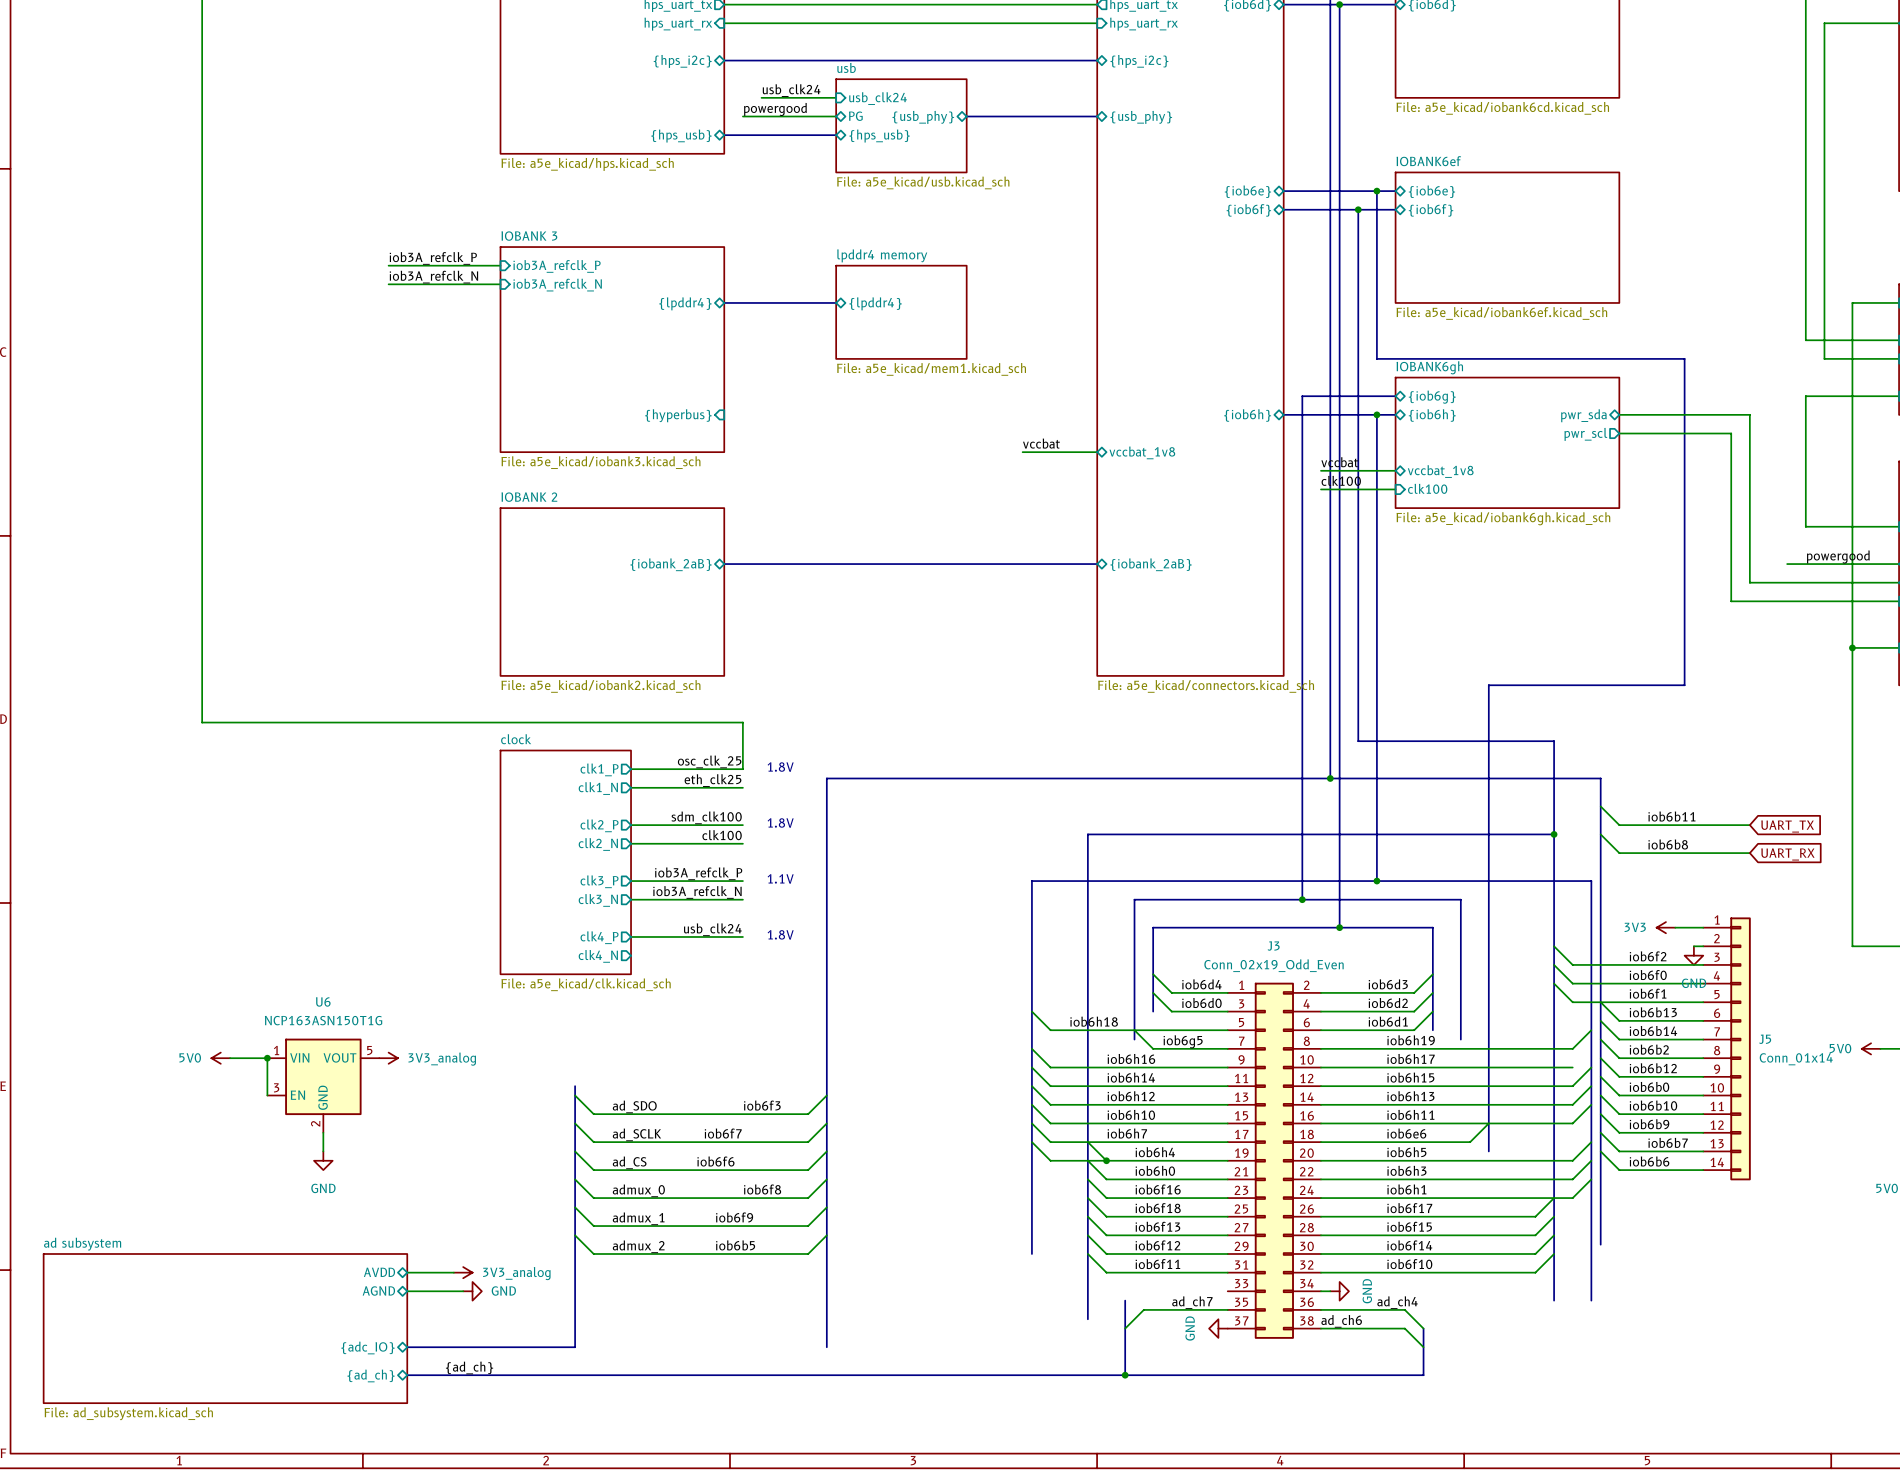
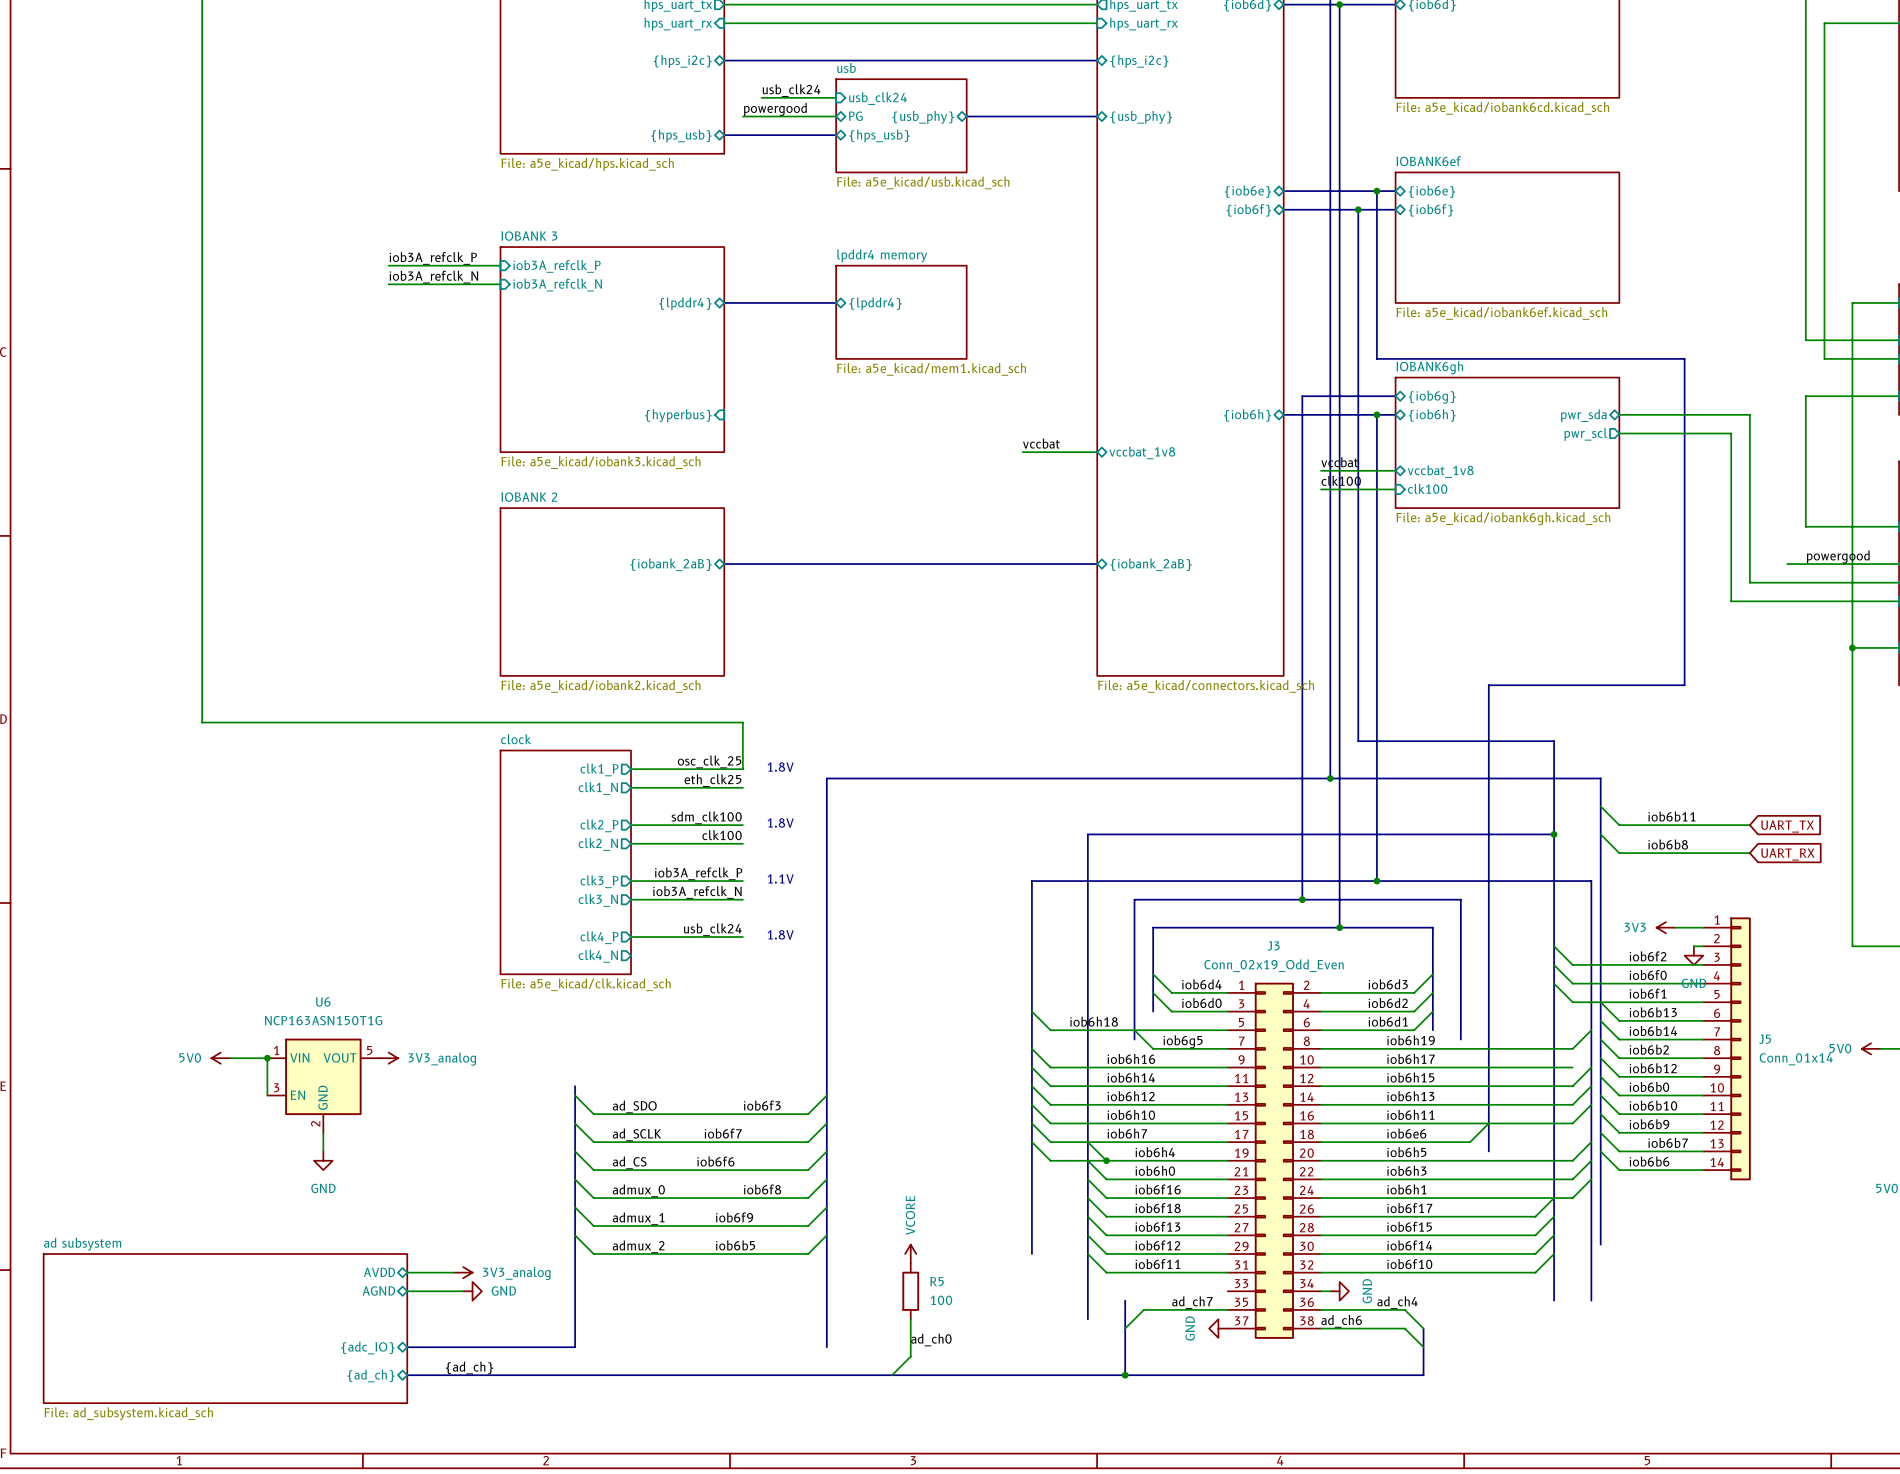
power symbol: none -> VCORE (910, 1253)
R5: none -> 100 (910, 1291)
wire: none -> (910, 1319) (910, 1356) (892, 1375)
label: none -> ad_ch0 (931, 1340)

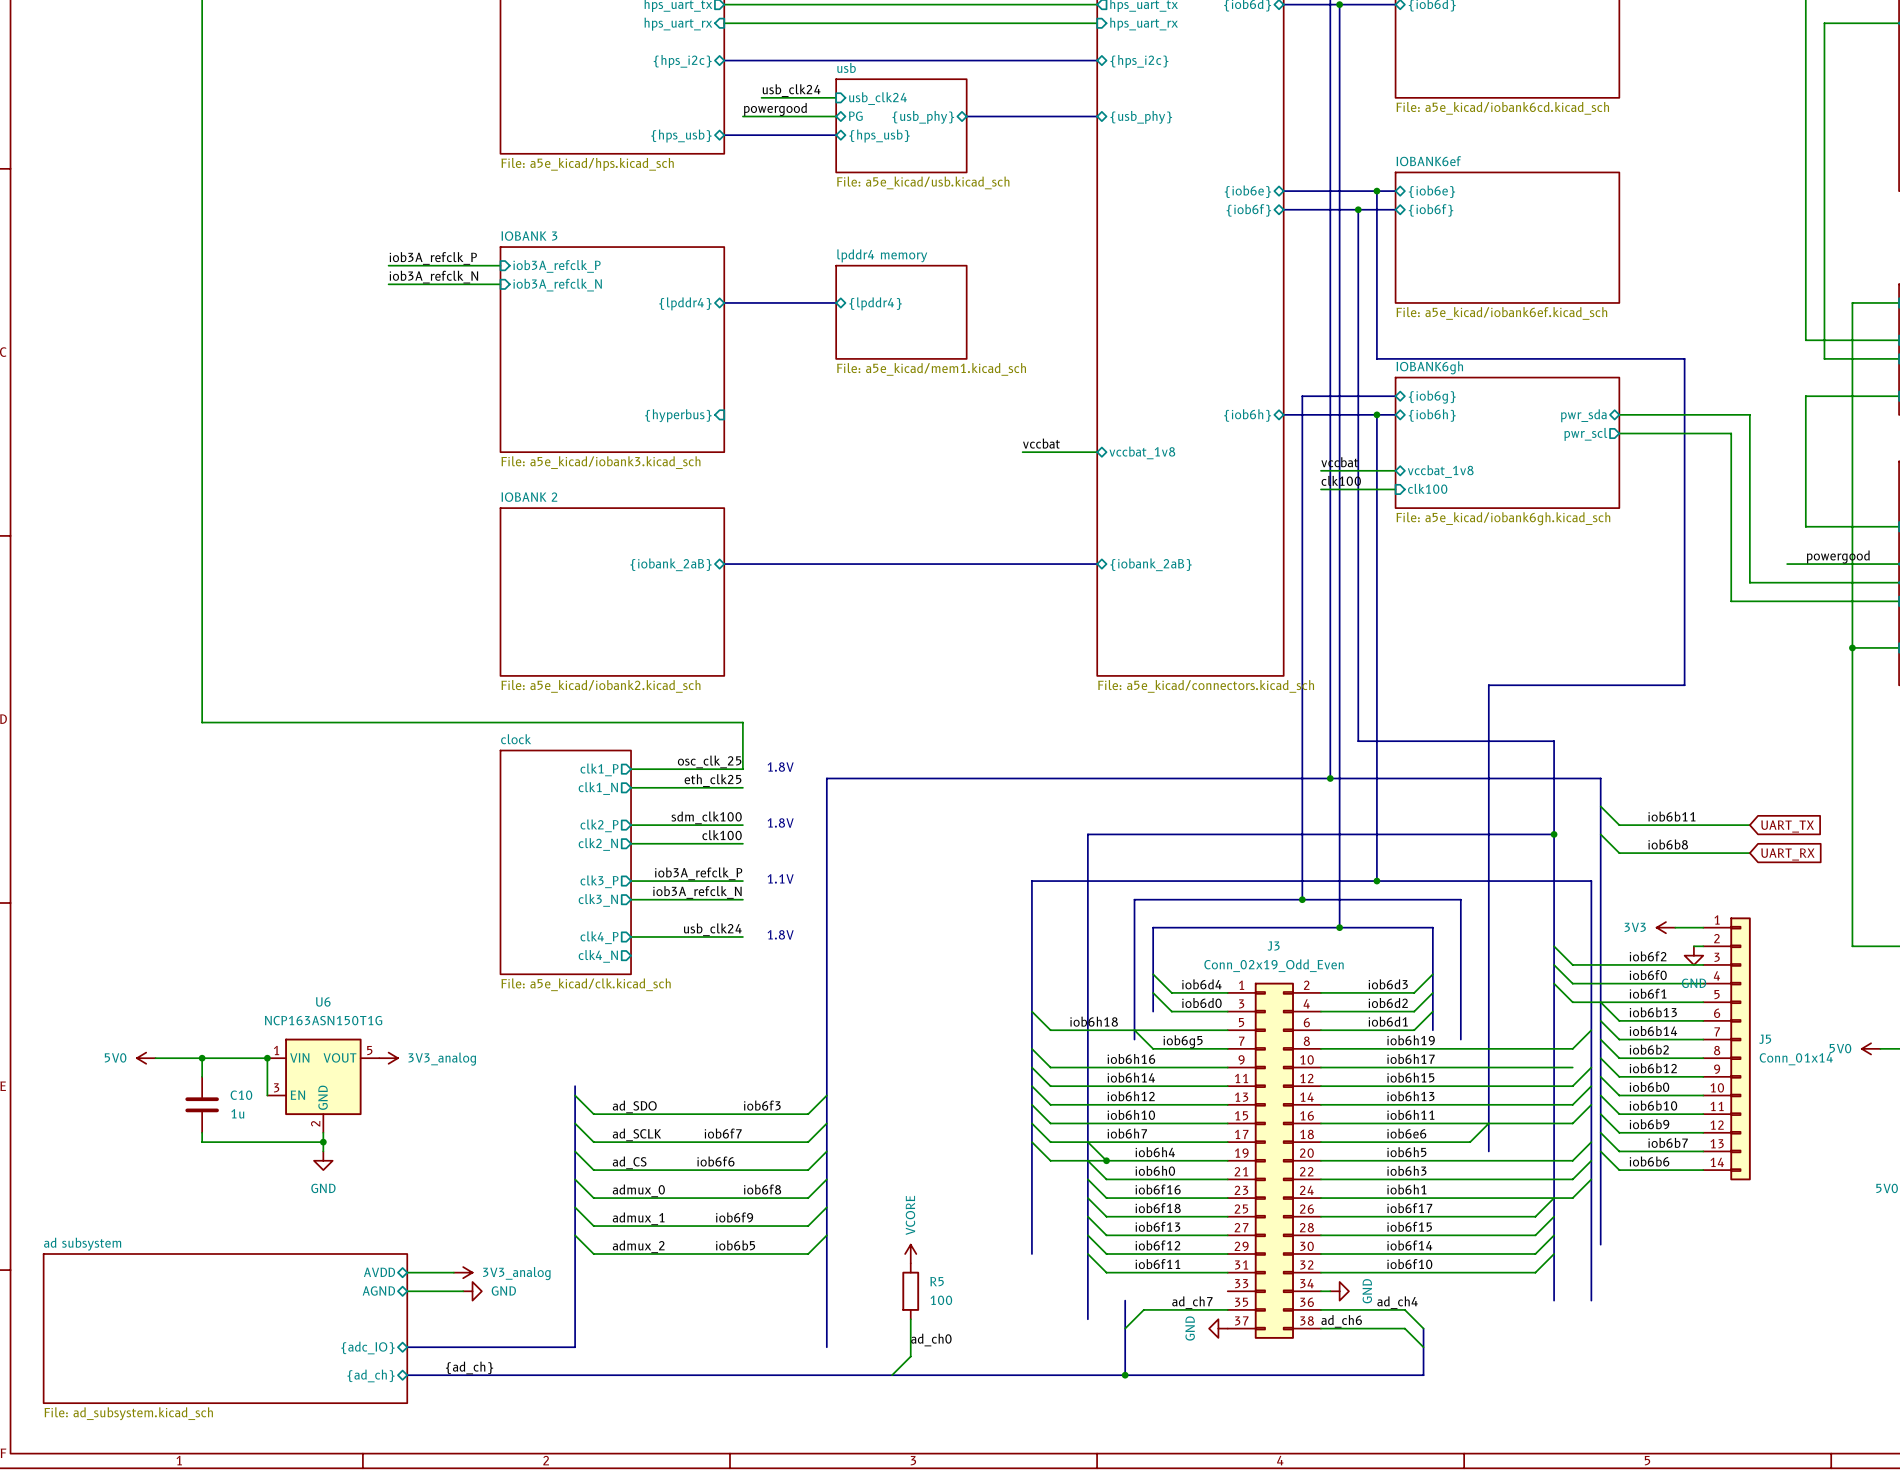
wire: none -> (155, 1058) (230, 1058)
wire: none -> (202, 1058) (202, 1076)
junction: none -> (202, 1058)
power symbol position: 5V0 (220, 1058) -> 5V0 (146, 1058)
C10: none -> 1u (202, 1104)
wire: none -> (202, 1132) (202, 1142) (323, 1142)
junction: none -> (323, 1142)

